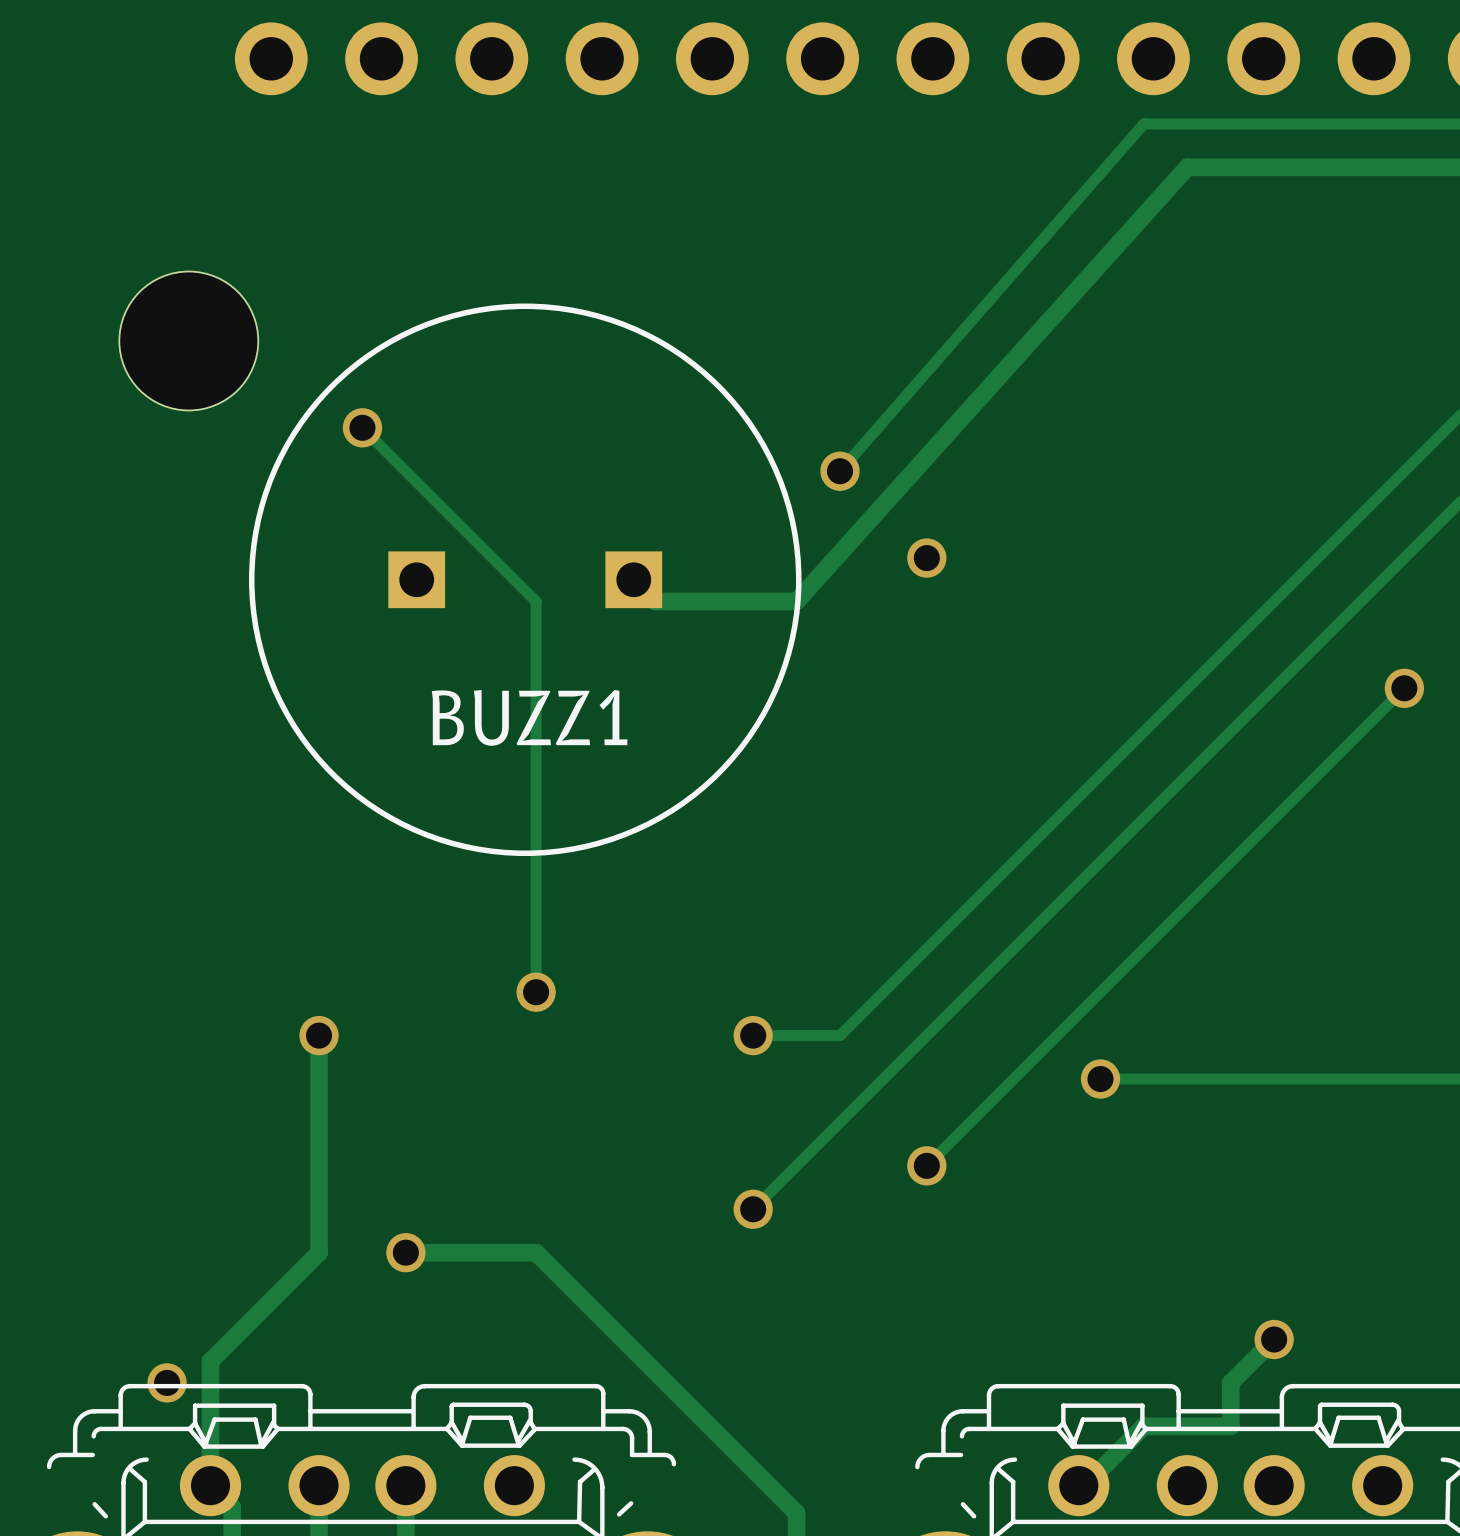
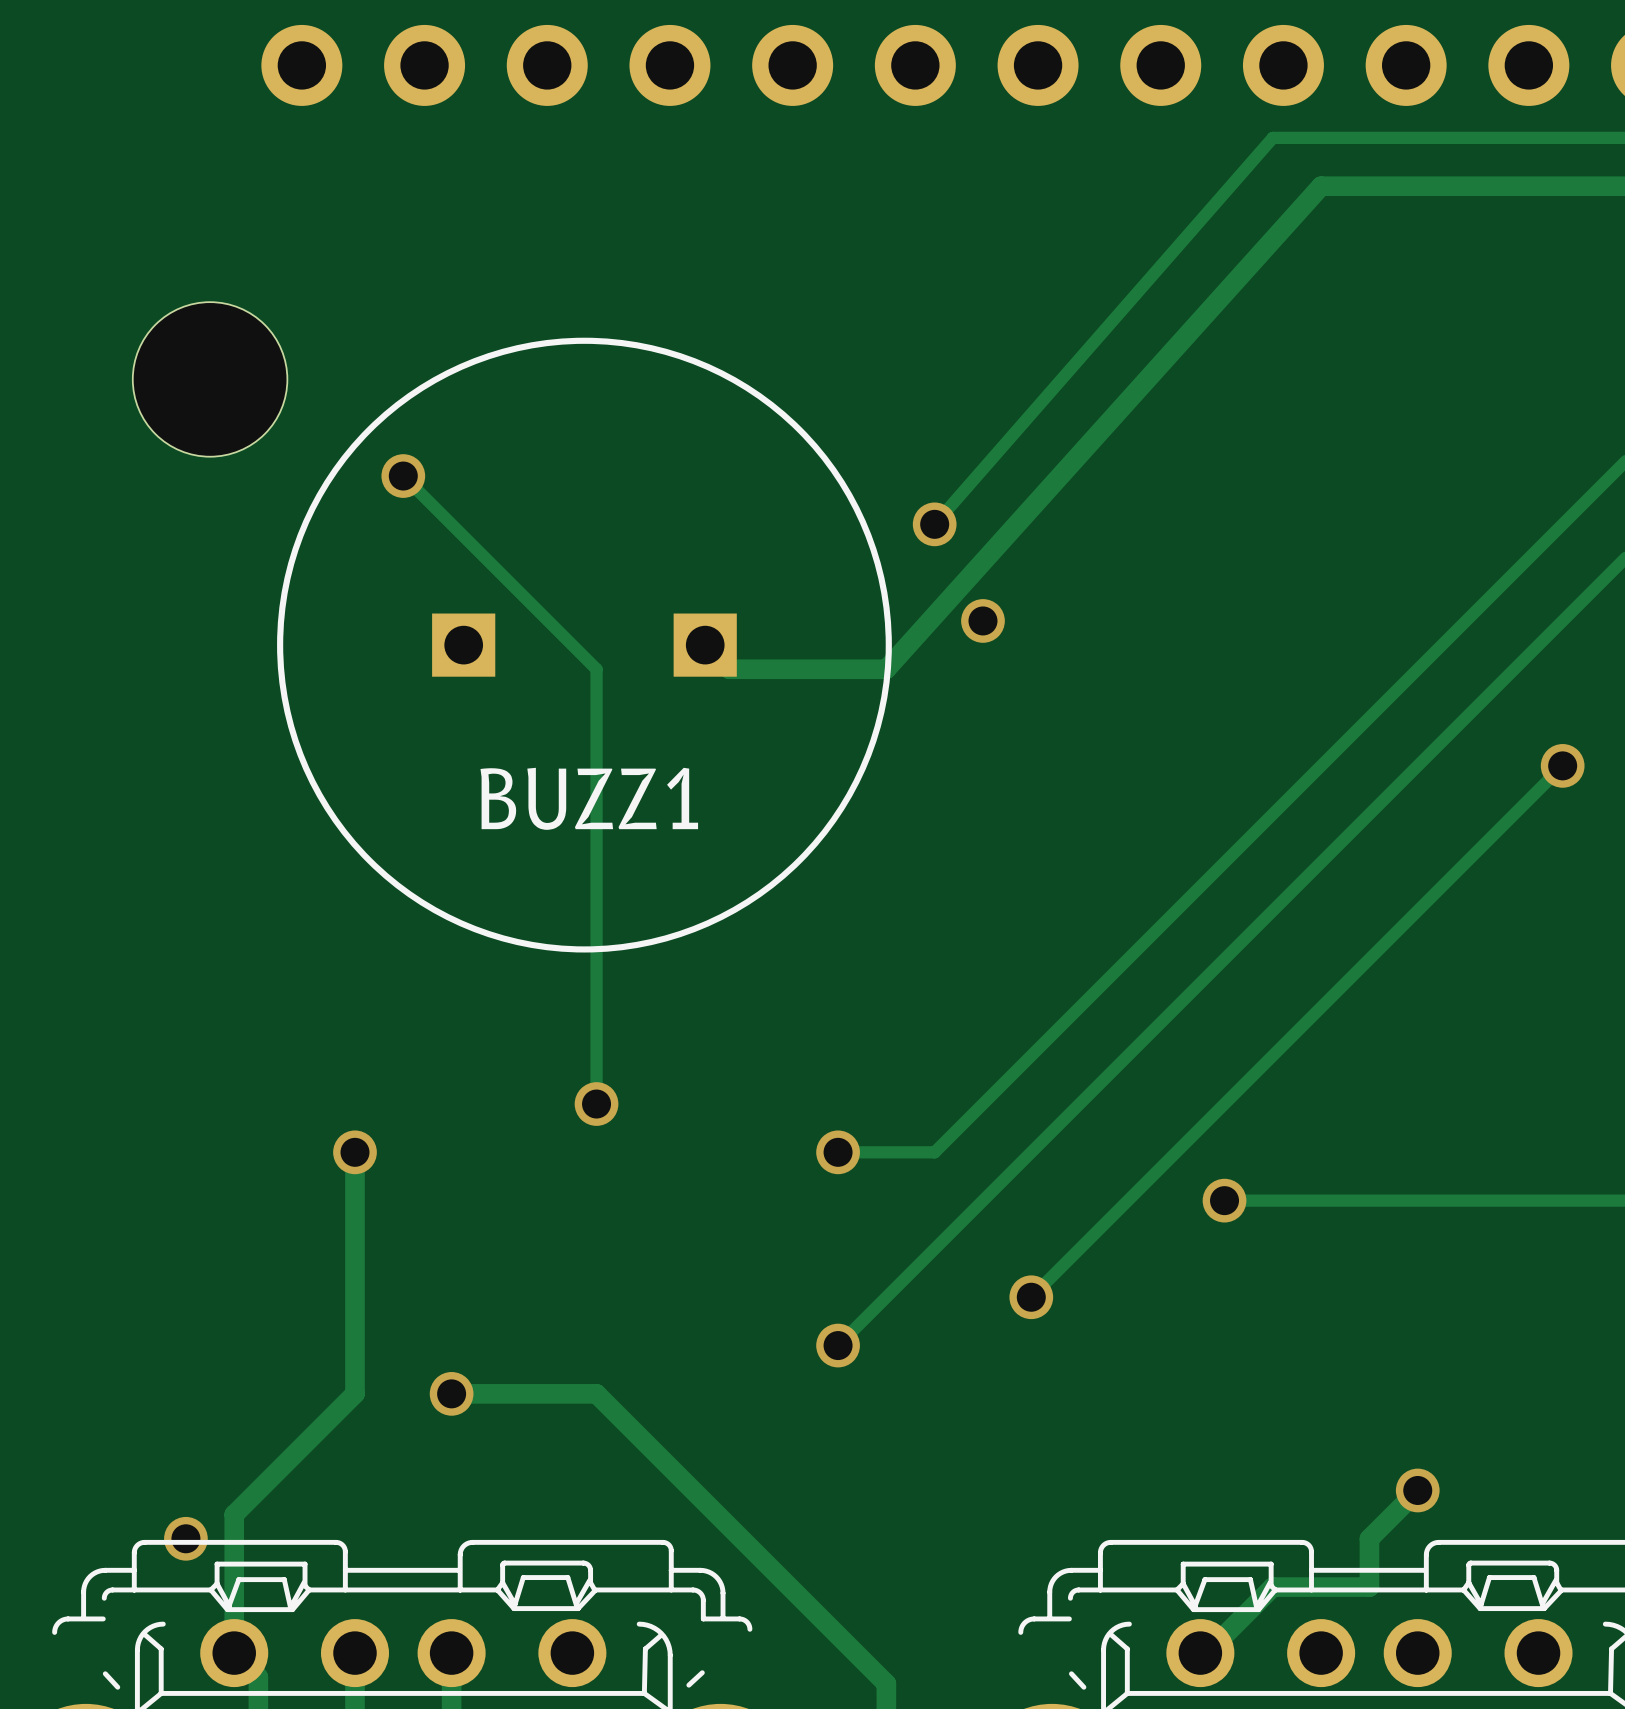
via position: (926, 558) -> (982, 620)

